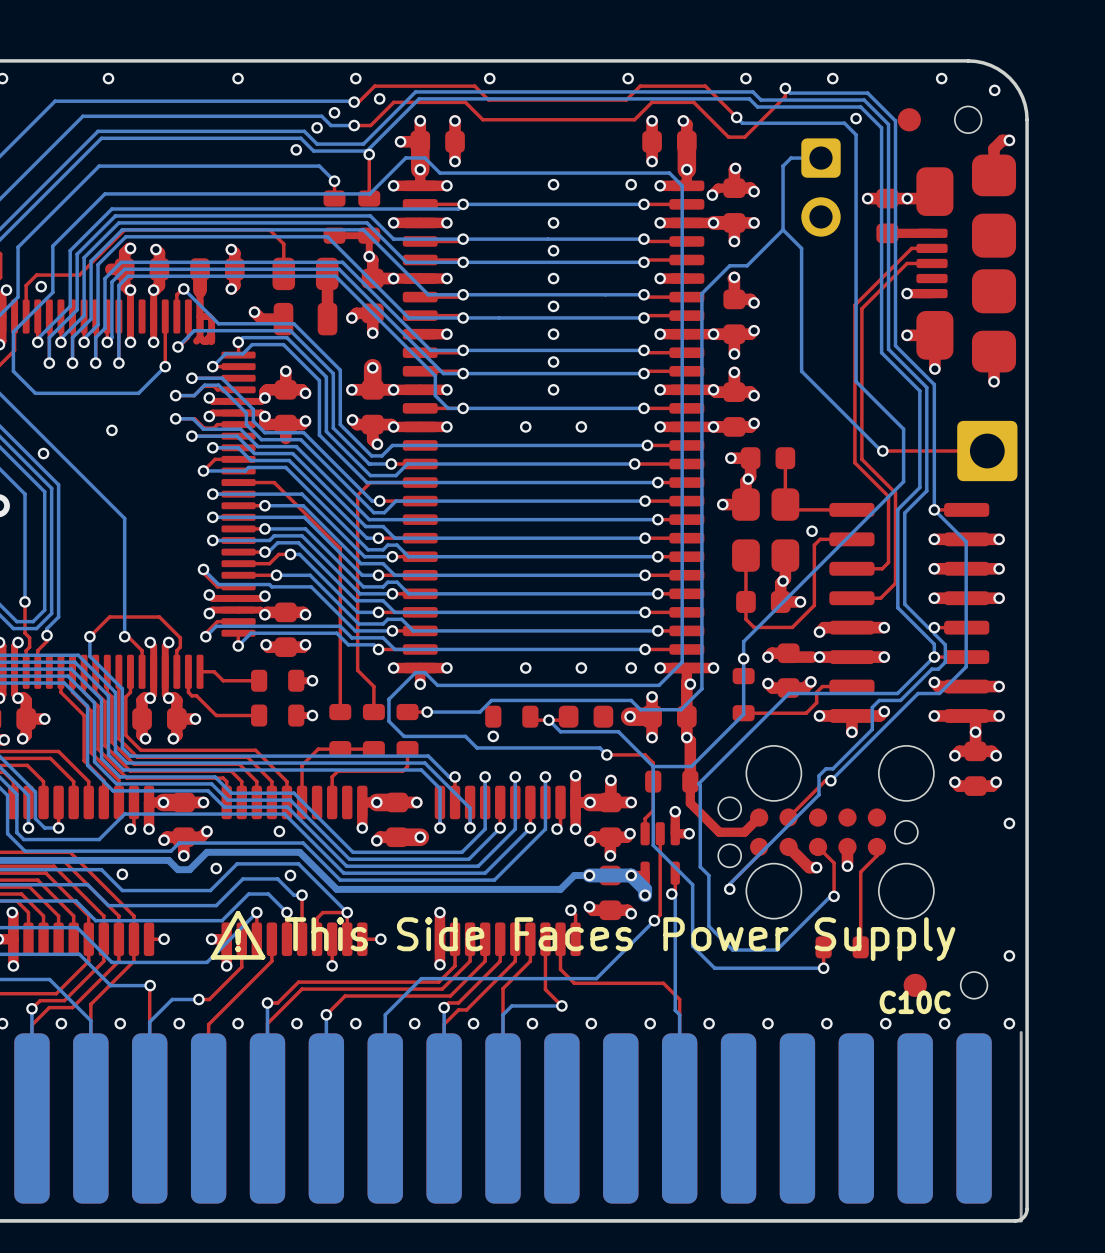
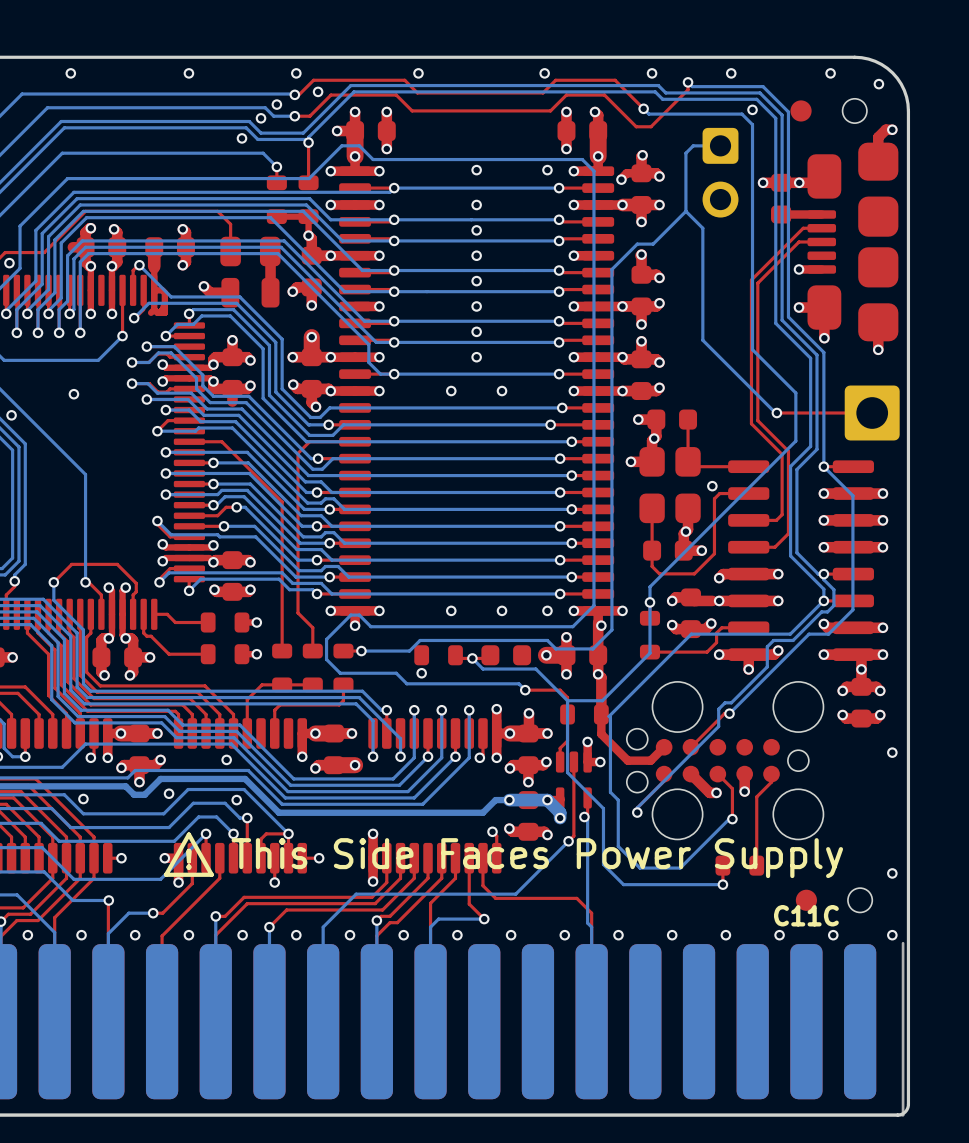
text: C10C (915, 1002) -> C11C (806, 915)

